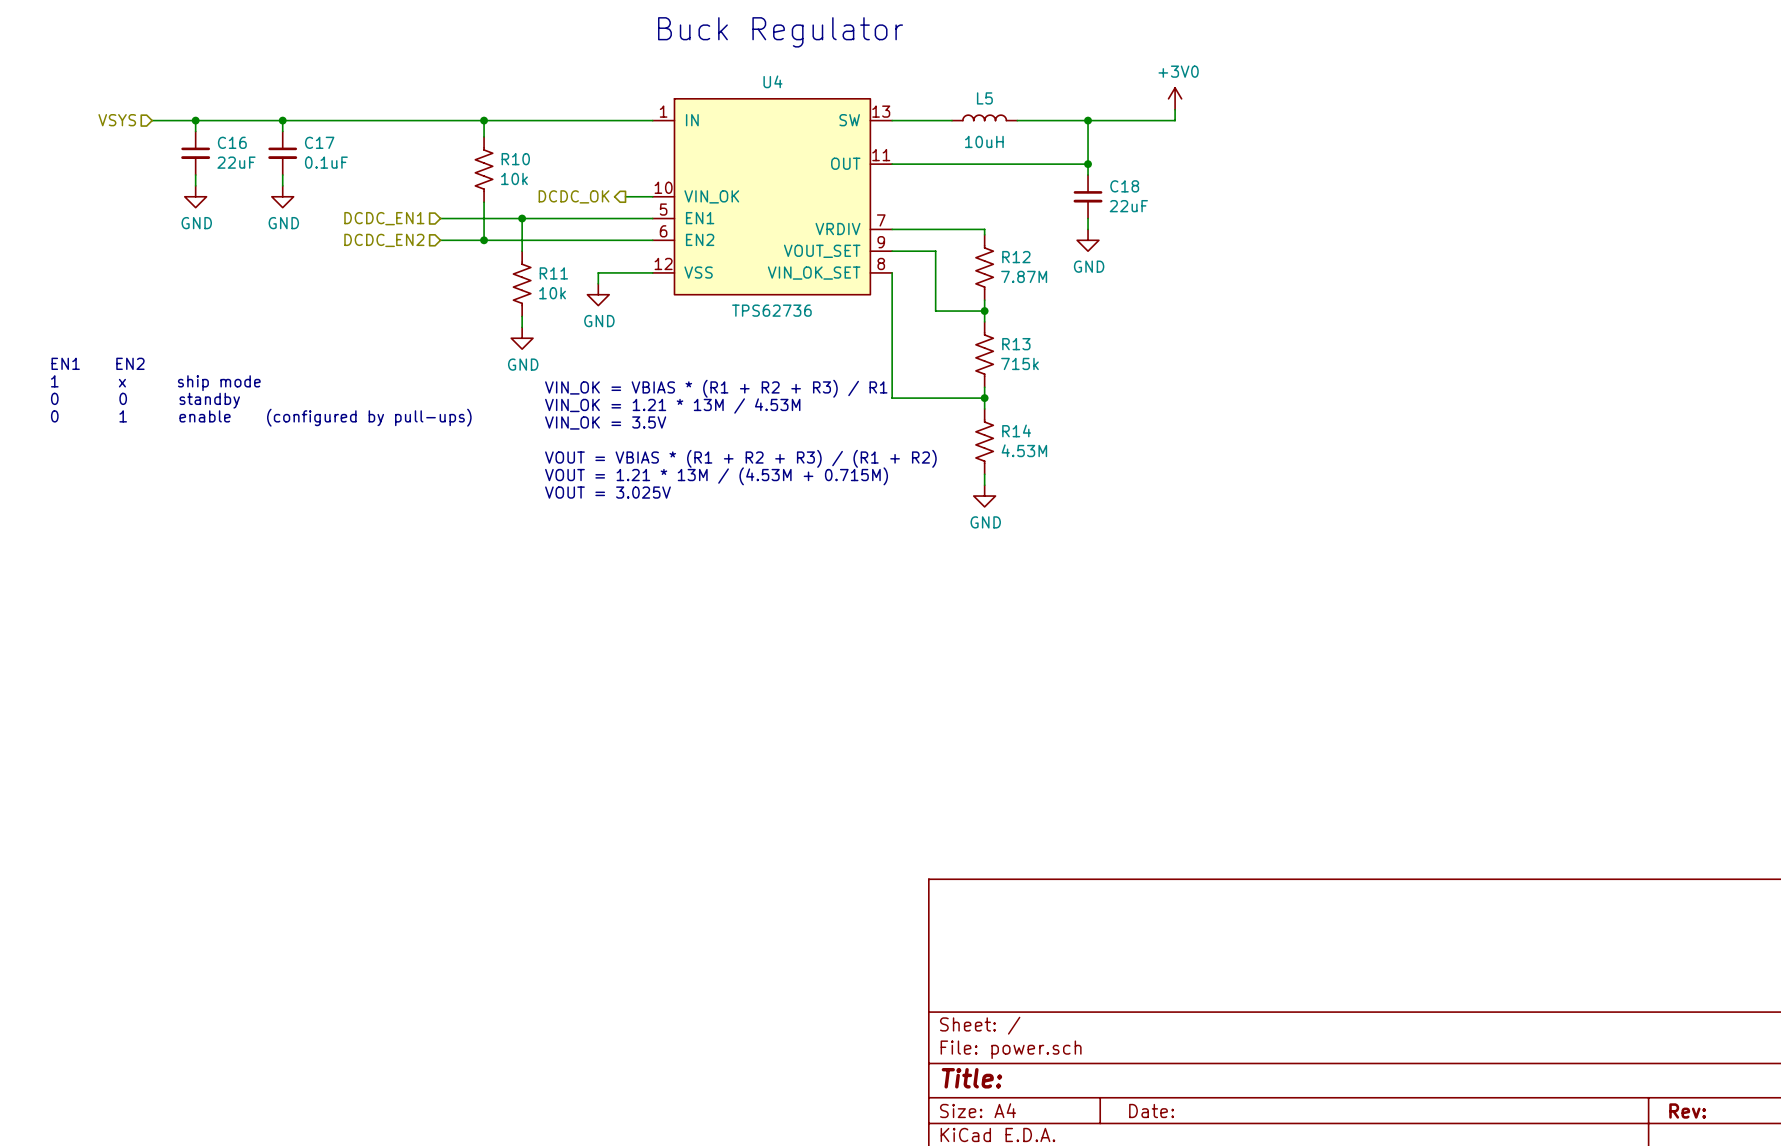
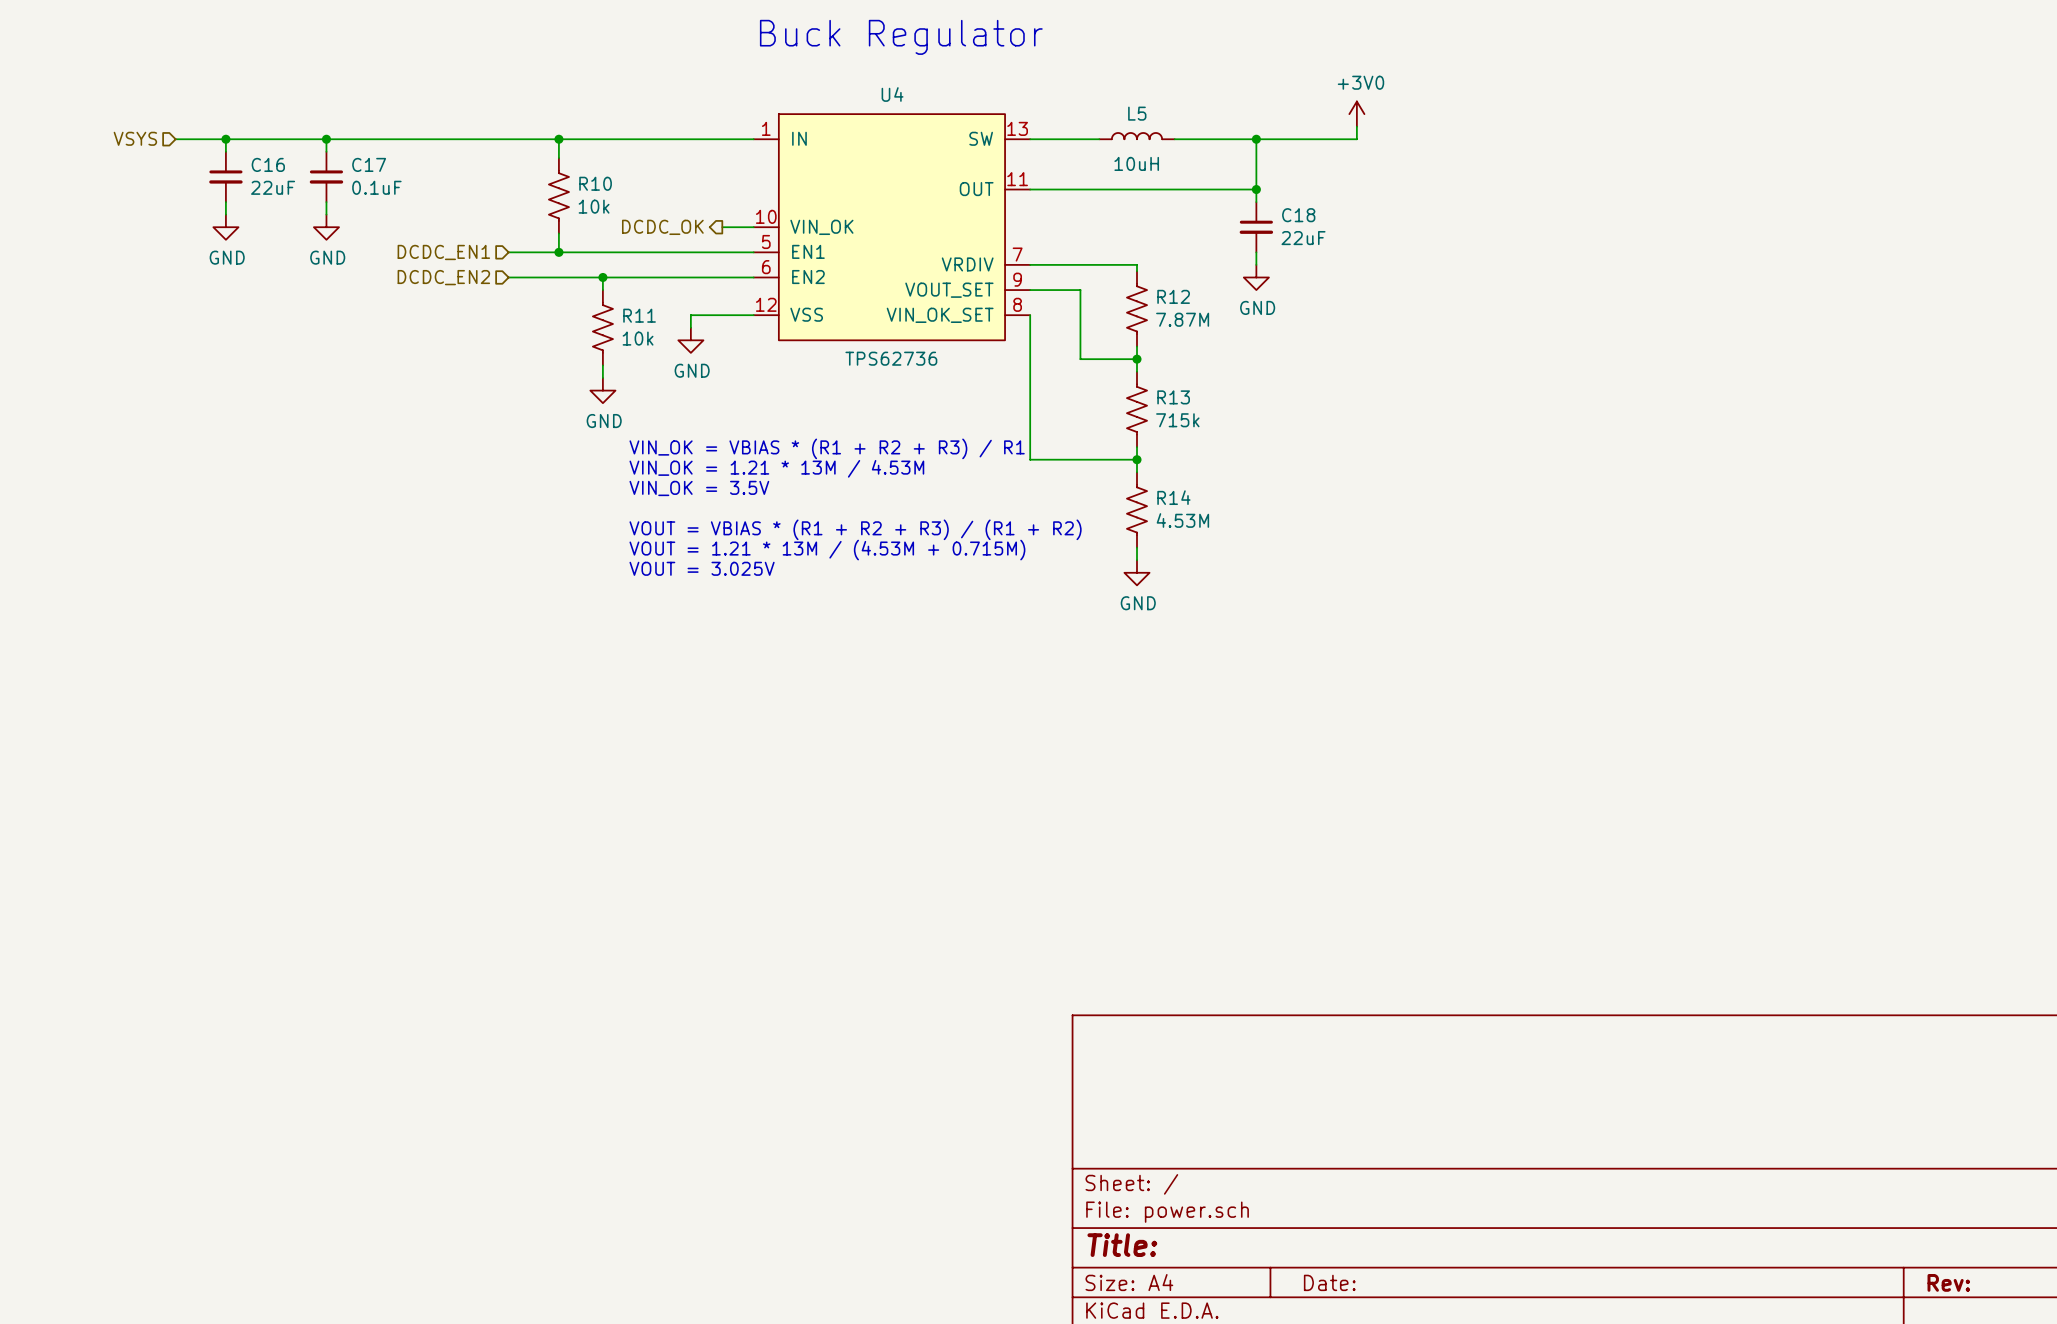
wire: (484, 218) (484, 240) -> none
junction: none -> (558, 252)
wire: (522, 218) (522, 240) -> none
junction: (522, 218) -> none
junction: (484, 240) -> none
junction: none -> (602, 277)
text: EN1 EN2 (98, 363) -> none
text: 1 x ship mode (155, 383) -> none
text: 0 0 standby (145, 400) -> none
text: 0 1 enable (configured by pull-ups) (261, 417) -> none

